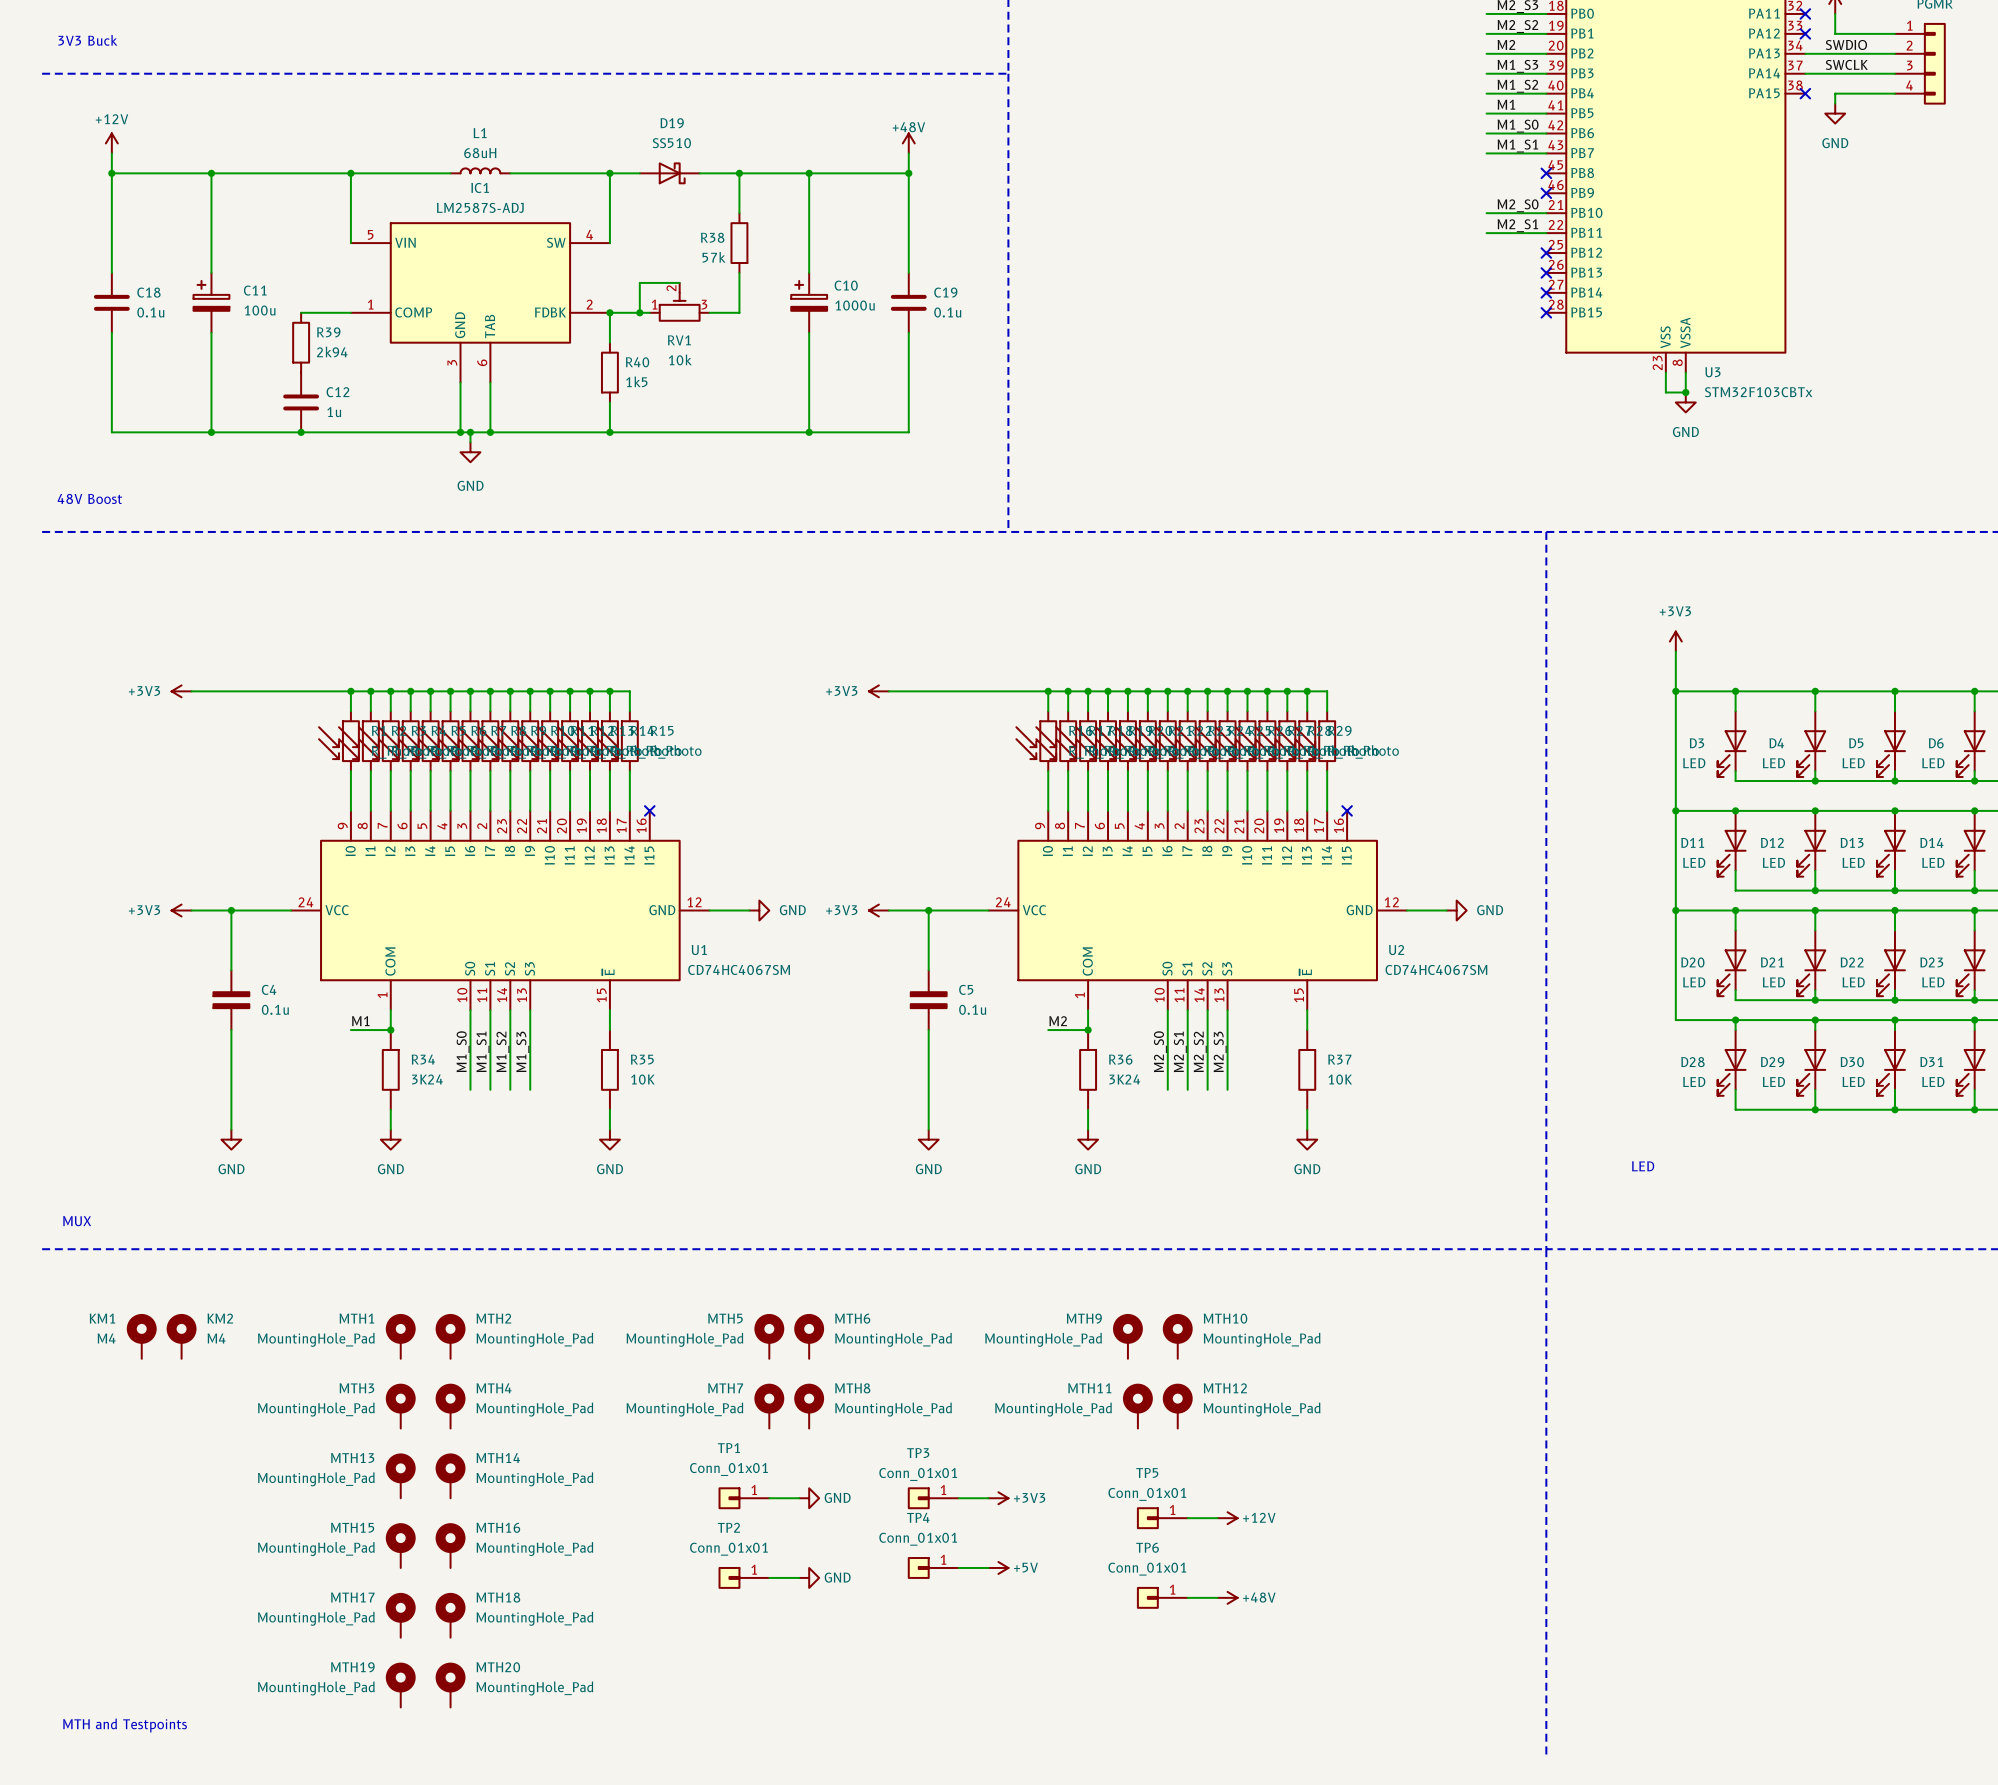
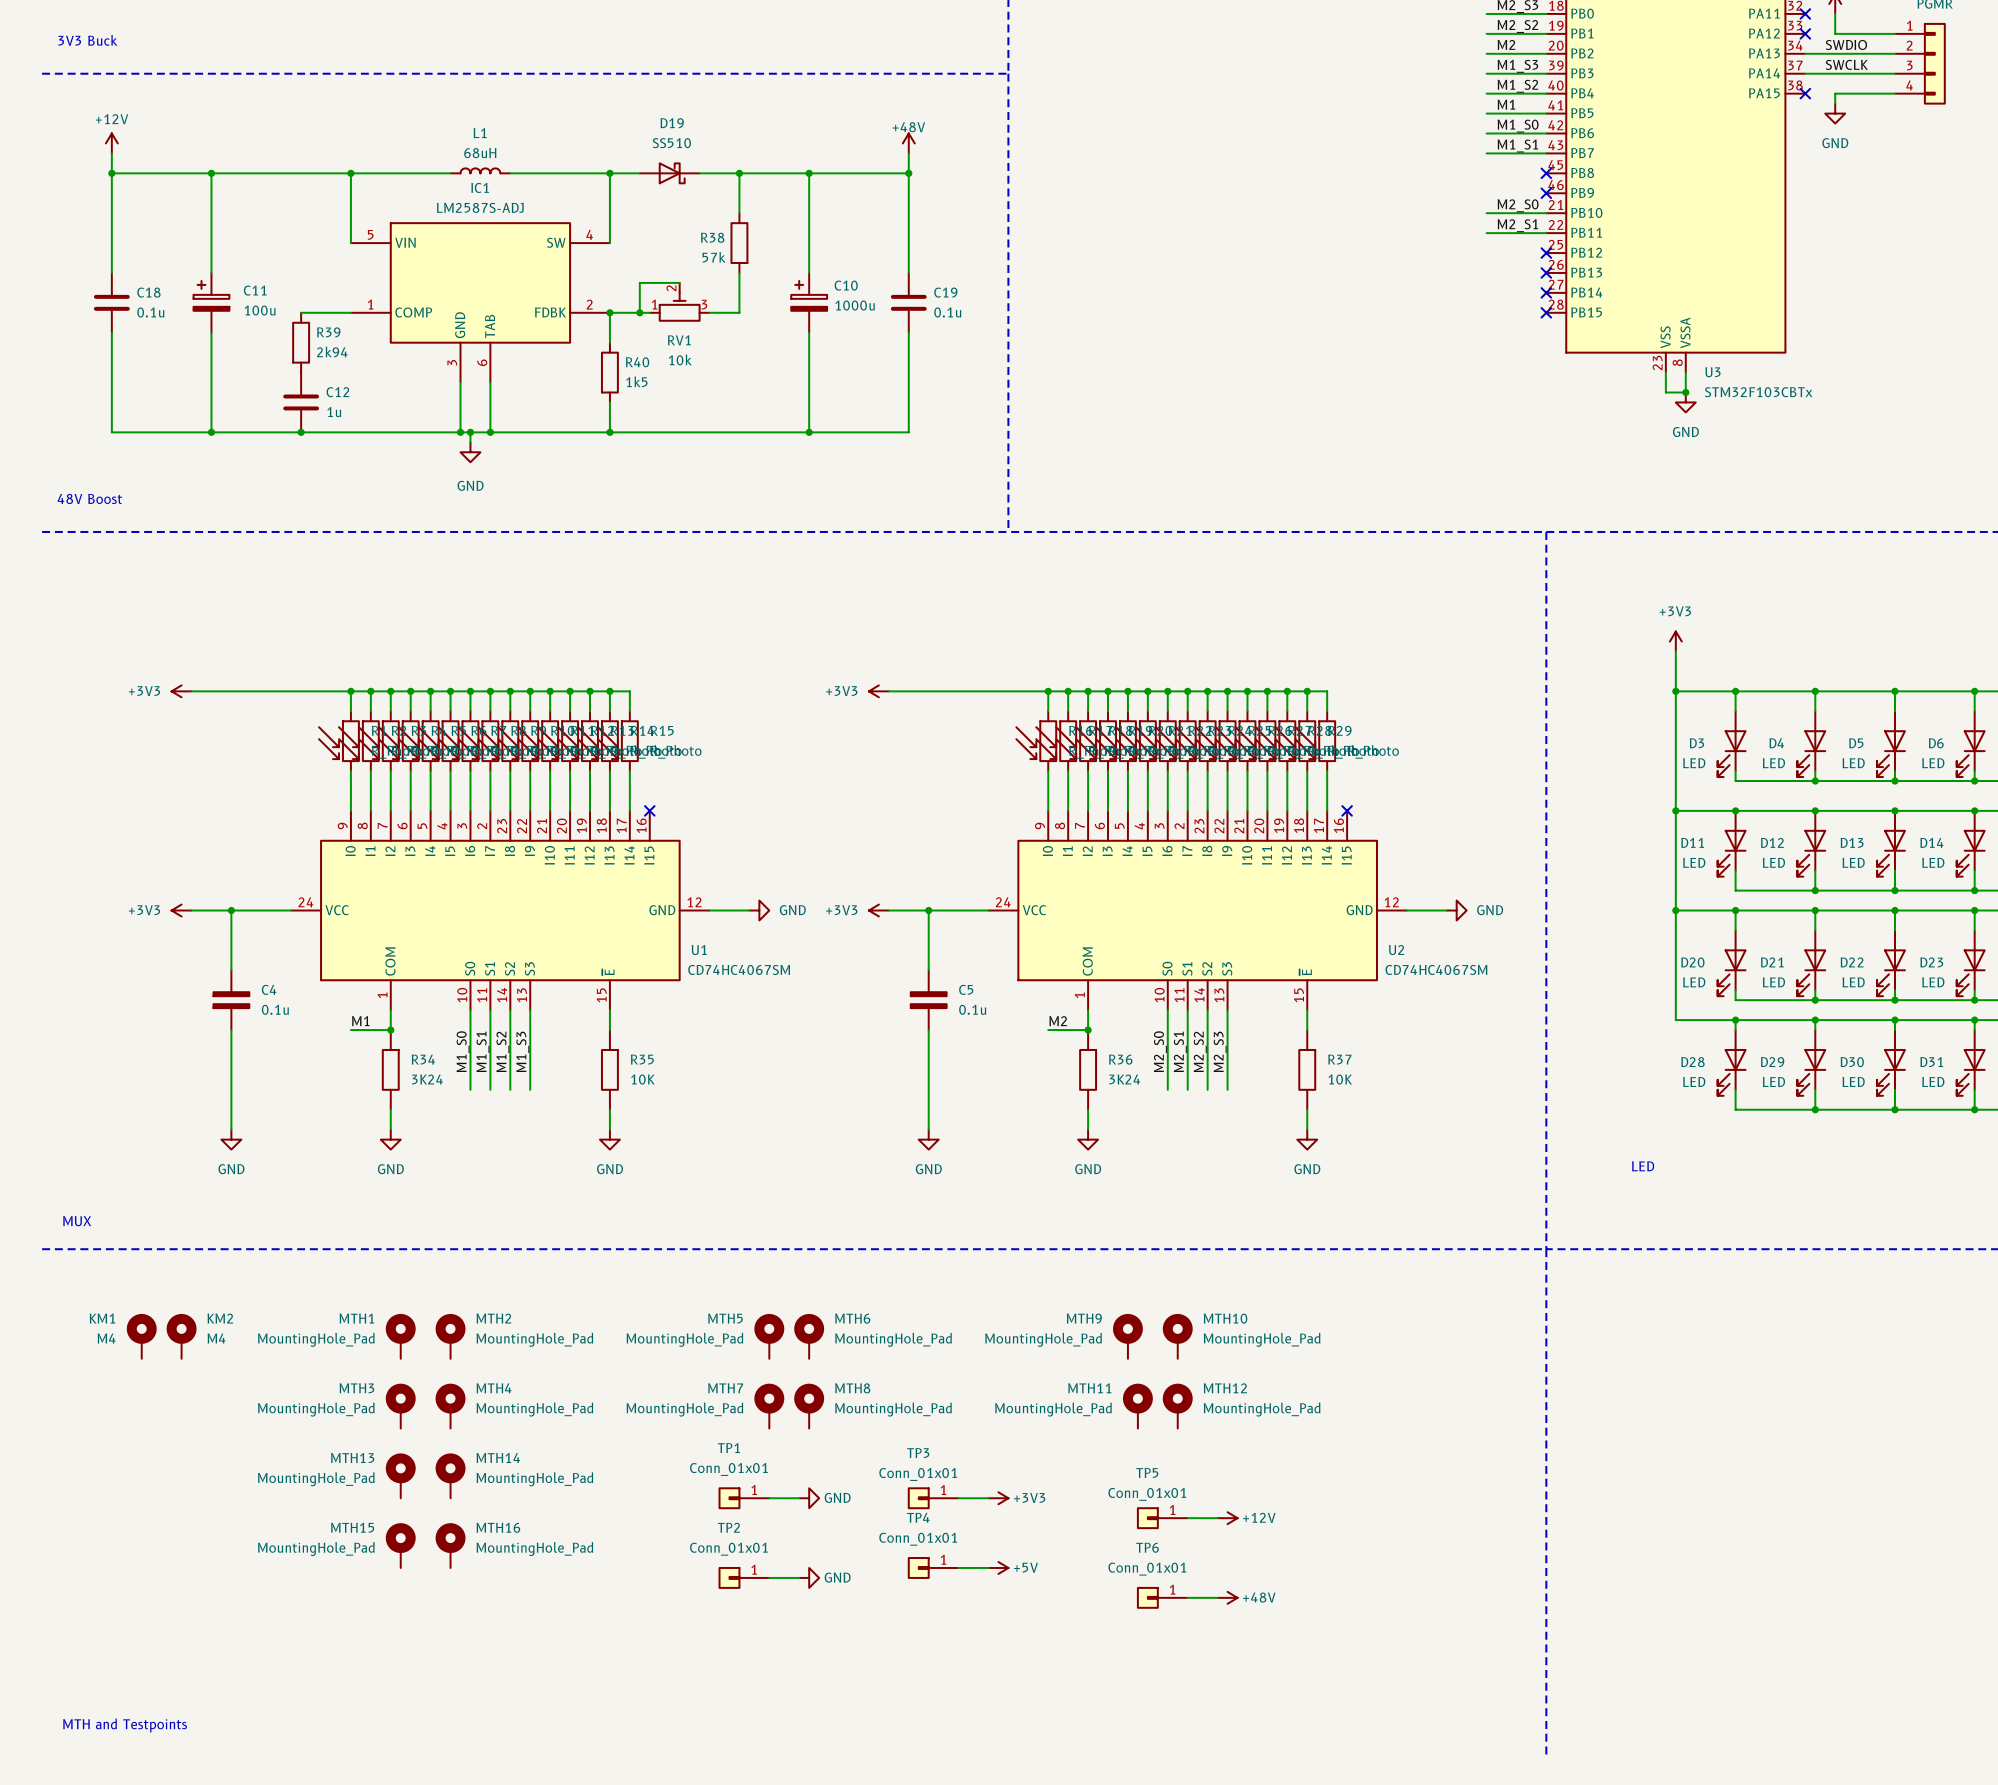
MTH17: MountingHole_Pad (400, 1615) -> none
MTH18: MountingHole_Pad (450, 1615) -> none
MTH19: MountingHole_Pad (400, 1685) -> none
MTH20: MountingHole_Pad (450, 1685) -> none

